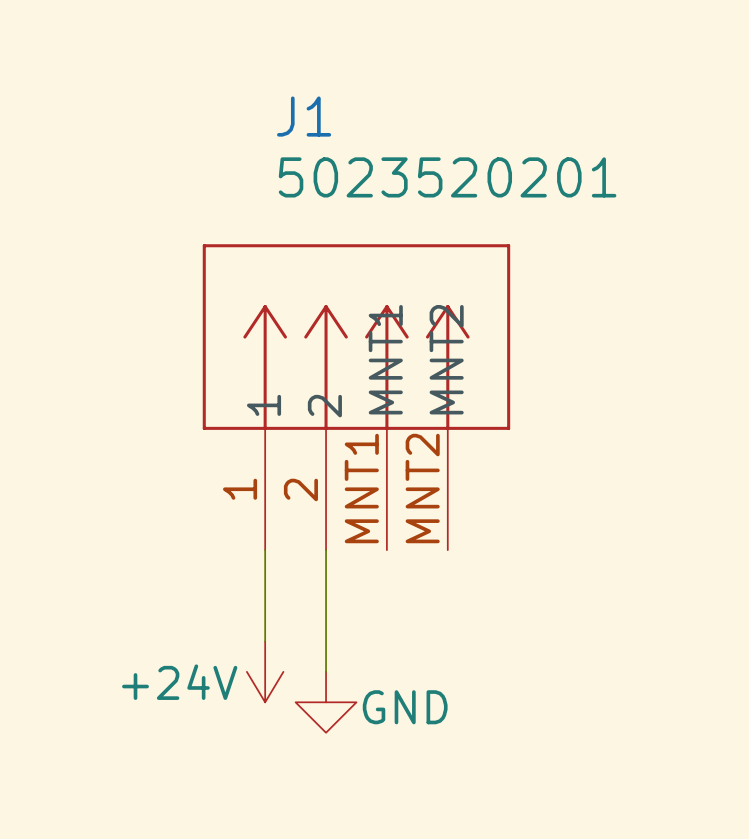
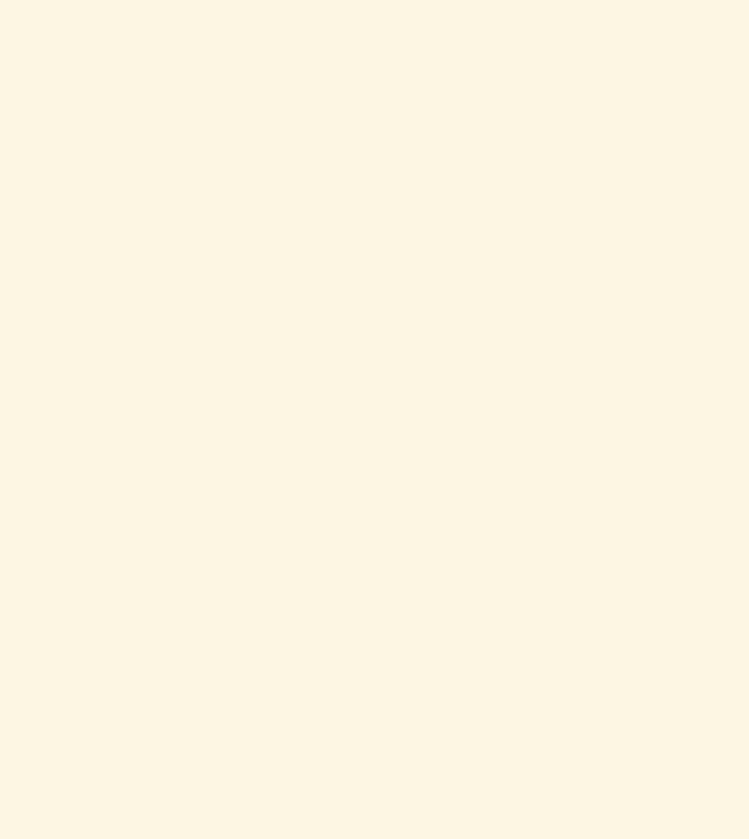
J1: 5023520201 (356, 397) -> none
wire: (265, 550) (265, 641) -> none
wire: (326, 550) (326, 671) -> none
power symbol: +24V (265, 671) -> none
power symbol: GND (326, 702) -> none

